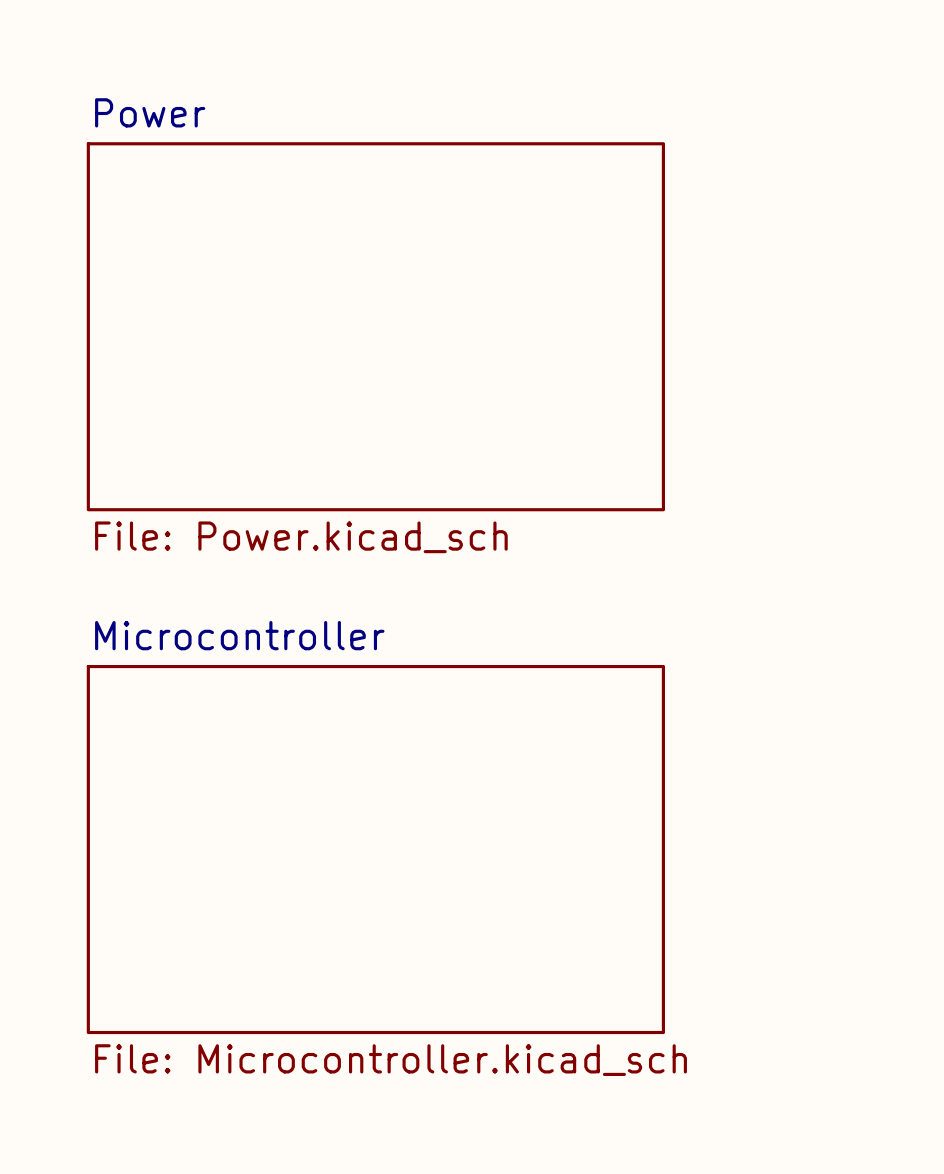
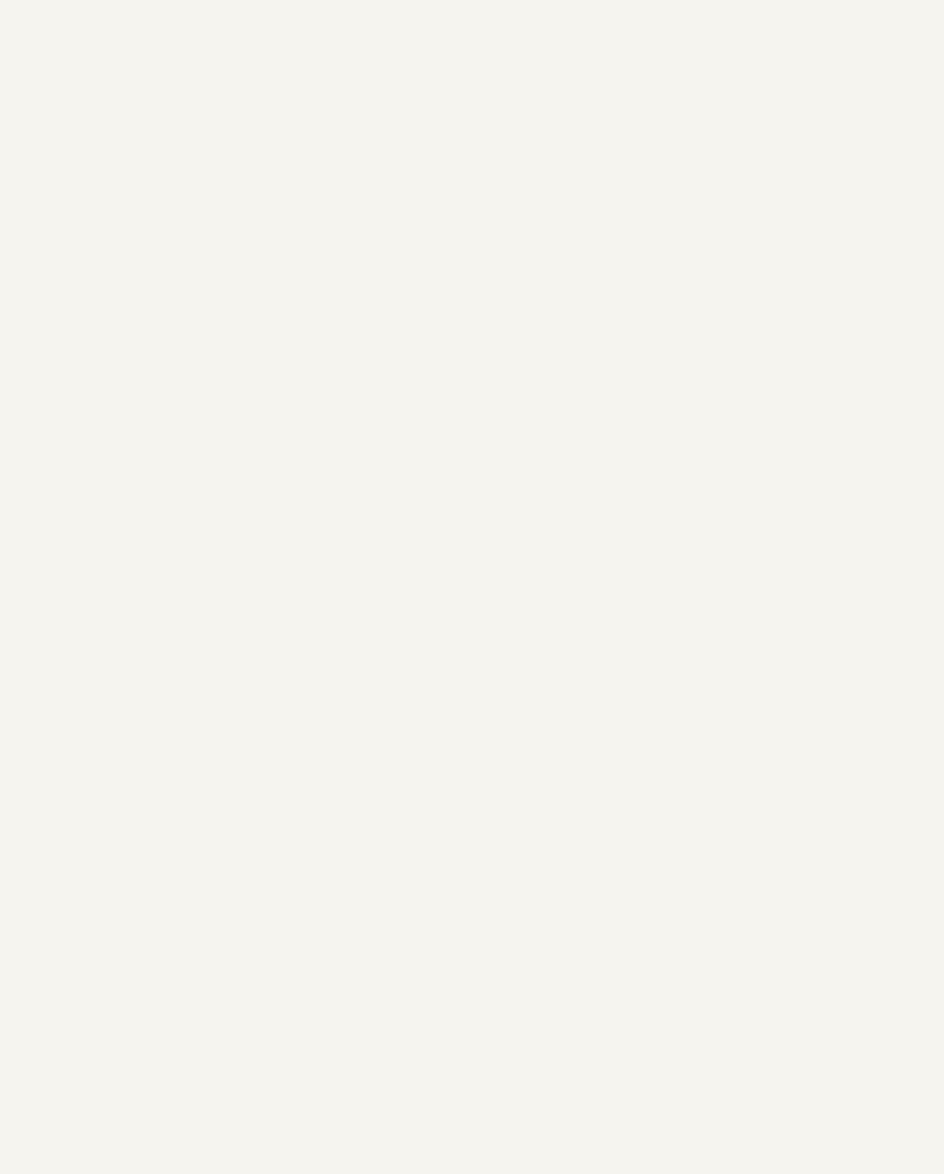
sheet Power: File: Power.kicad_sch (375, 326) -> none
sheet Microcontroller: File: Microcontroller.kicad_sch (375, 849) -> none

